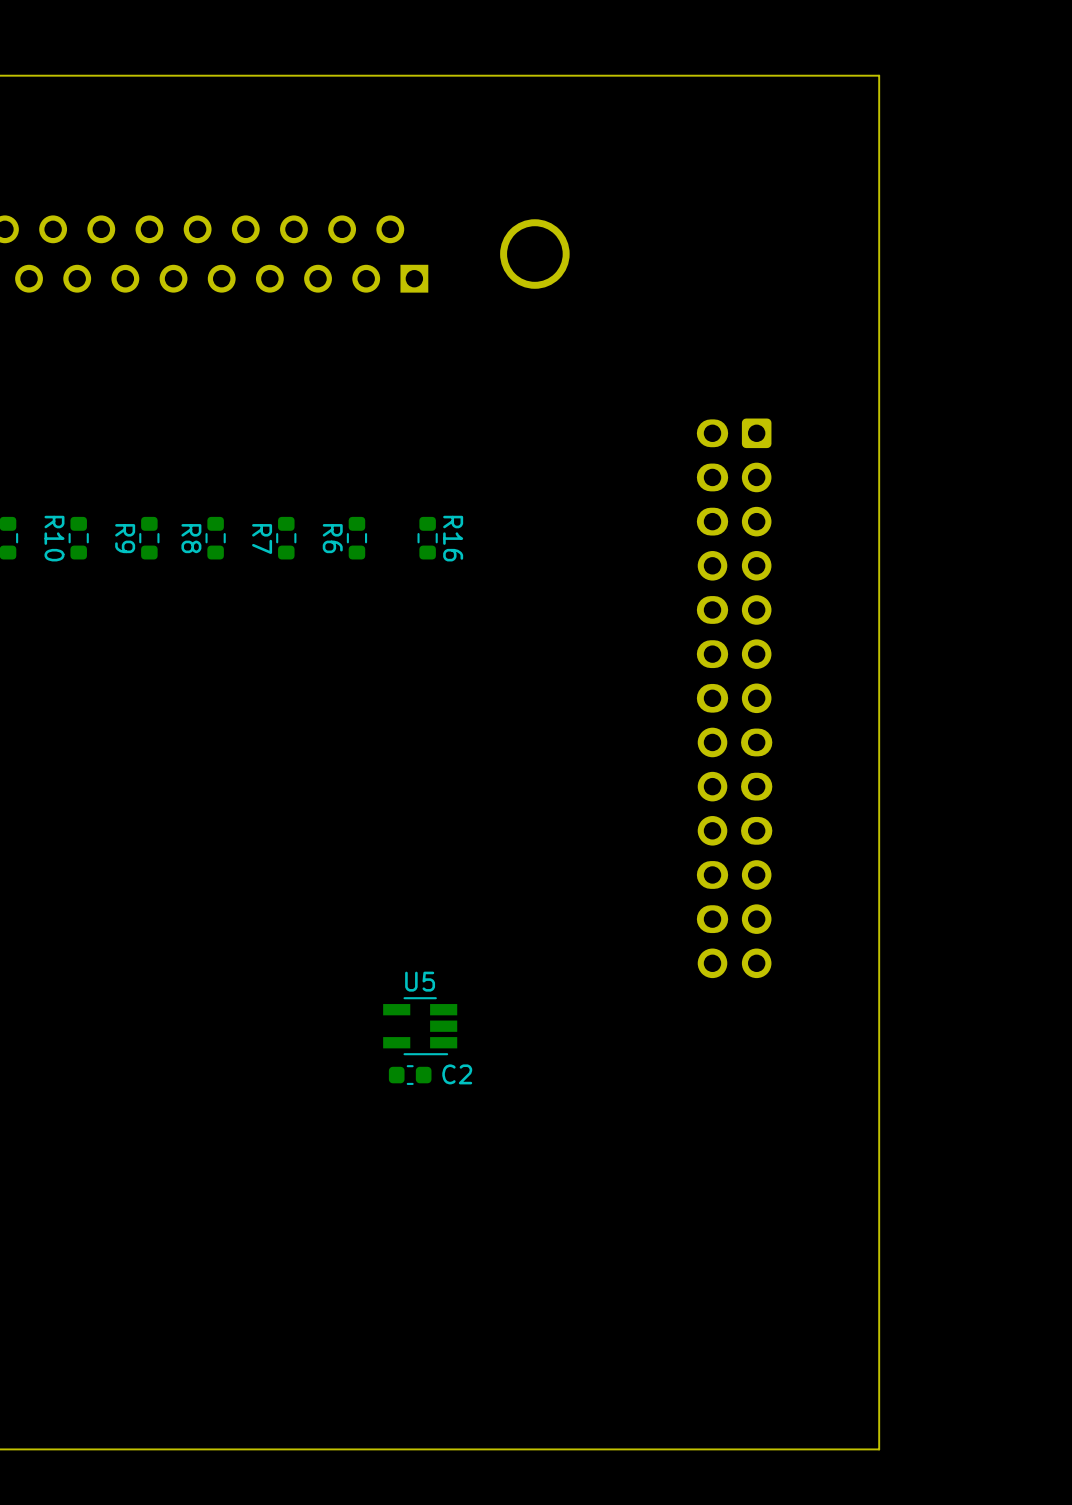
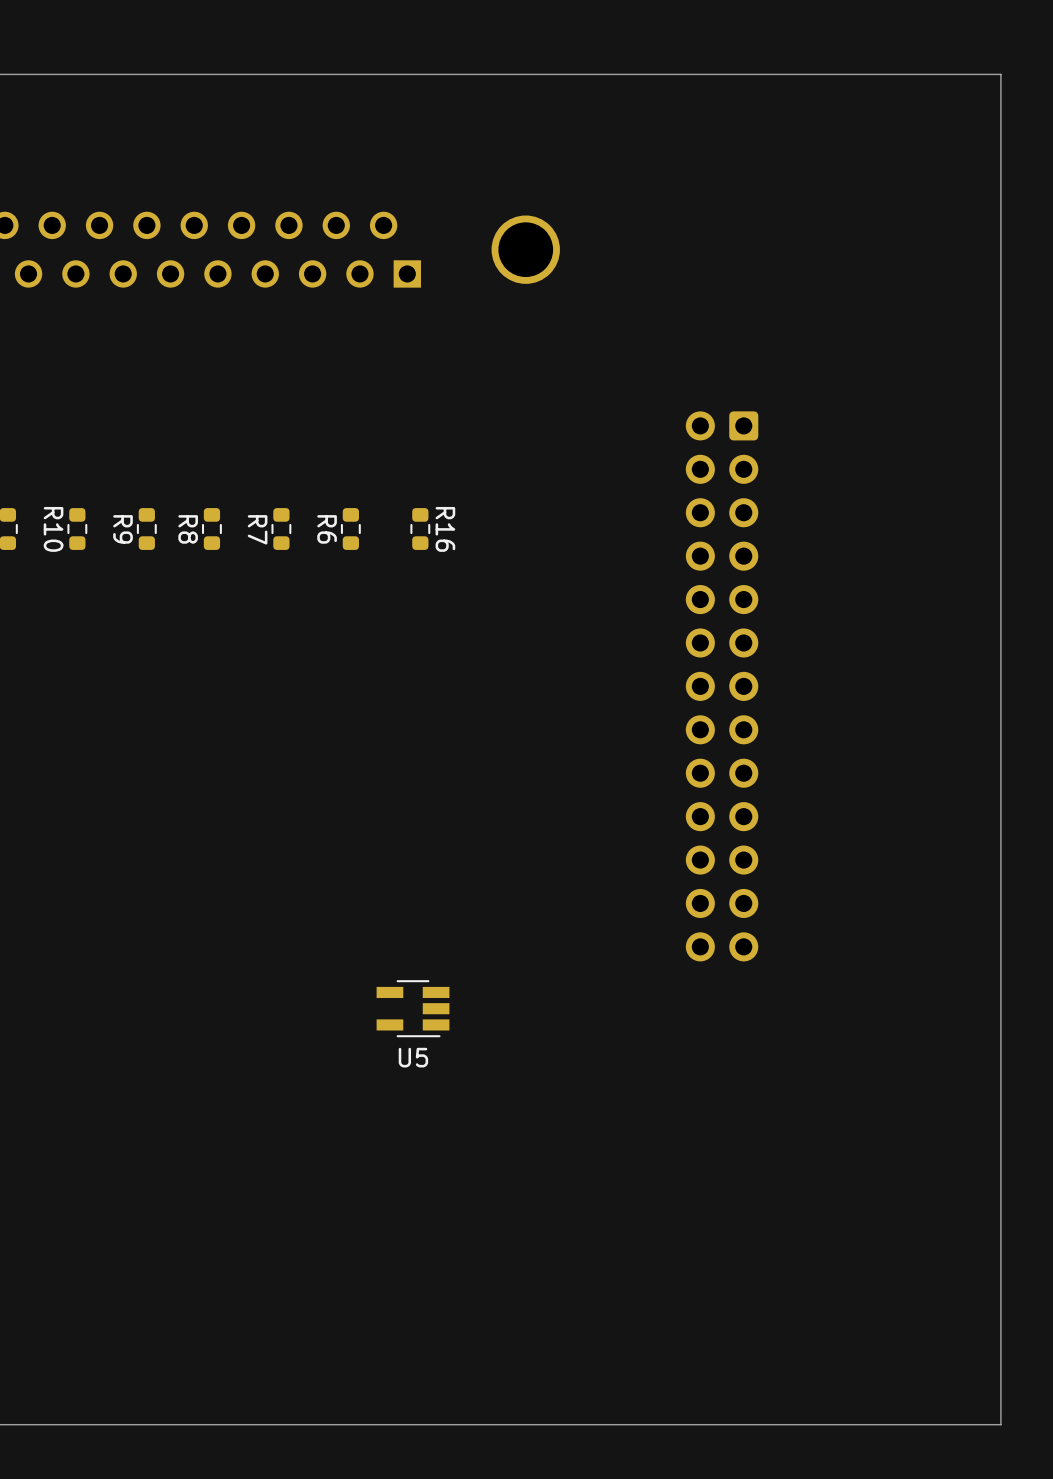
board edge: (879, 75) (879, 1449) -> (864, 74) (1000, 74) (1000, 1424) (864, 1424)
part footprint: [696, 418, 773, 979] -> [685, 411, 759, 962]
U5 name position: U5 (420, 981) -> U5 (413, 1057)
C2: (410, 1075) -> none

